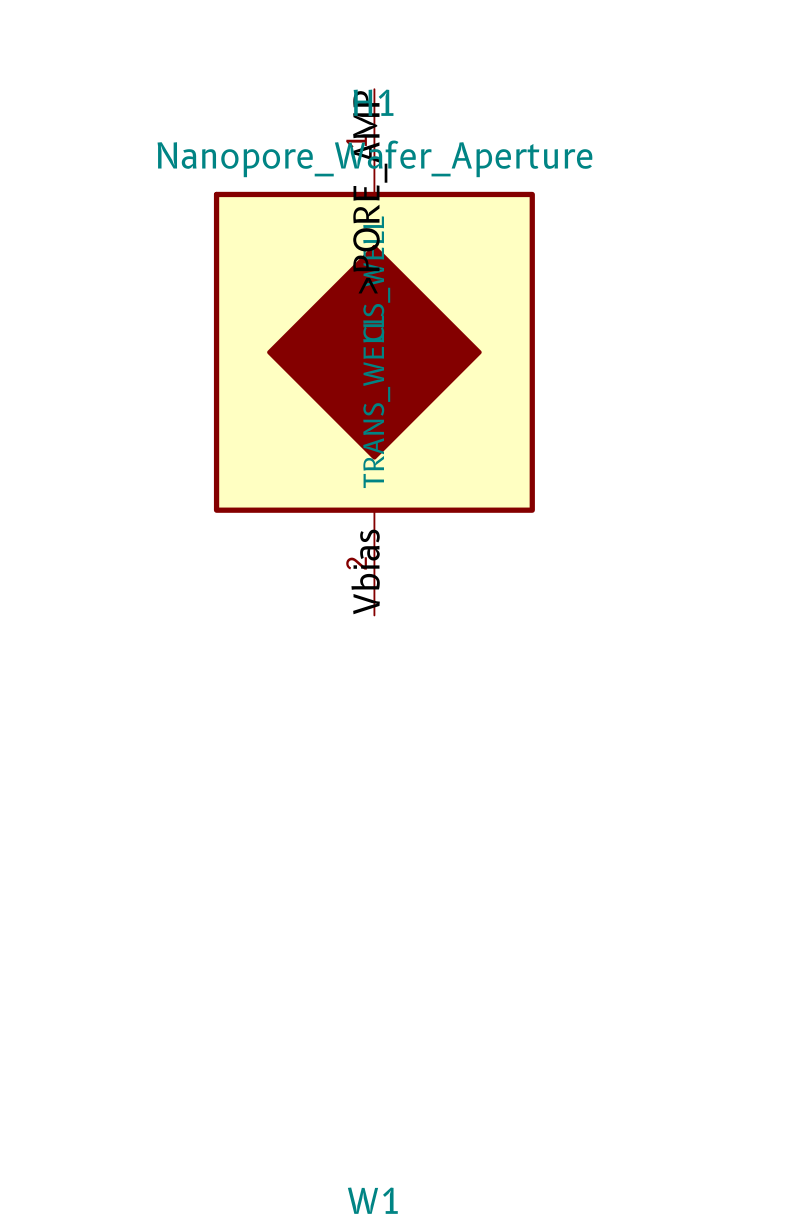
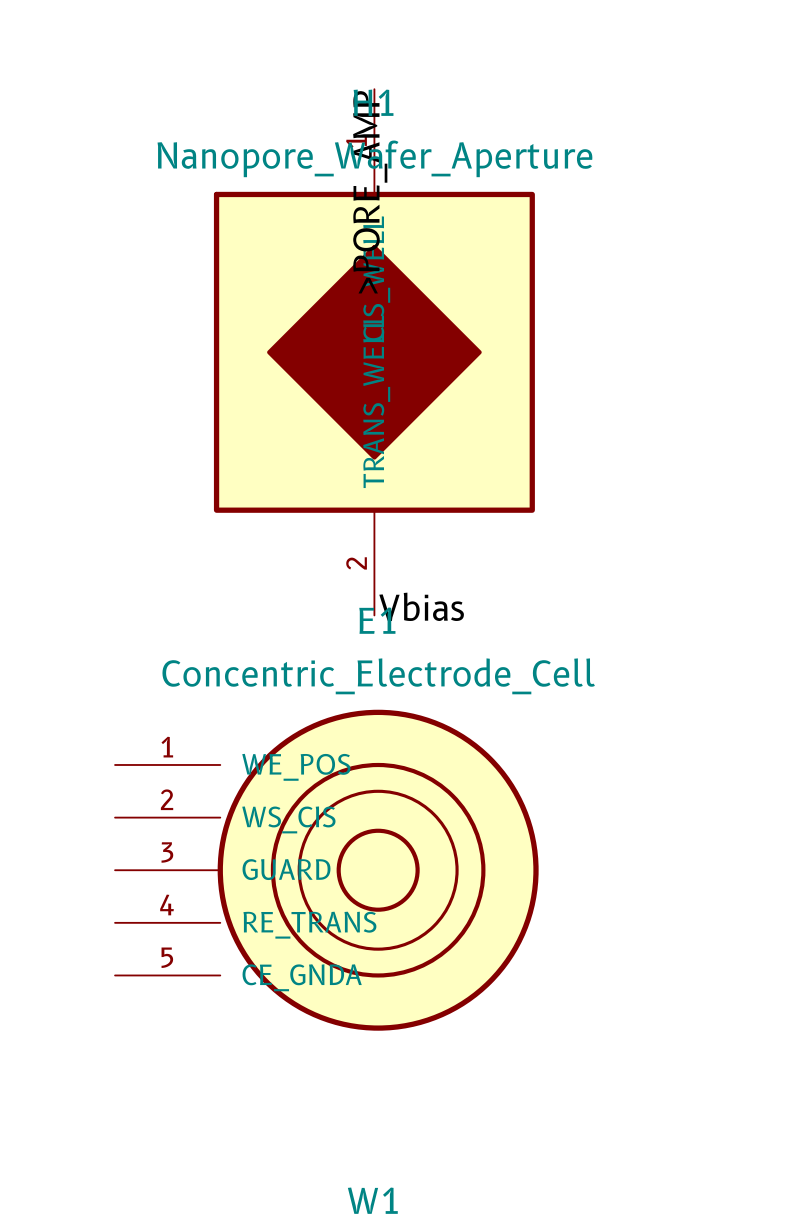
label rotation: 0° (365, 571) -> 90° clockwise (421, 606)
E1: none -> Concentric_Electrode_Cell (326, 870)

